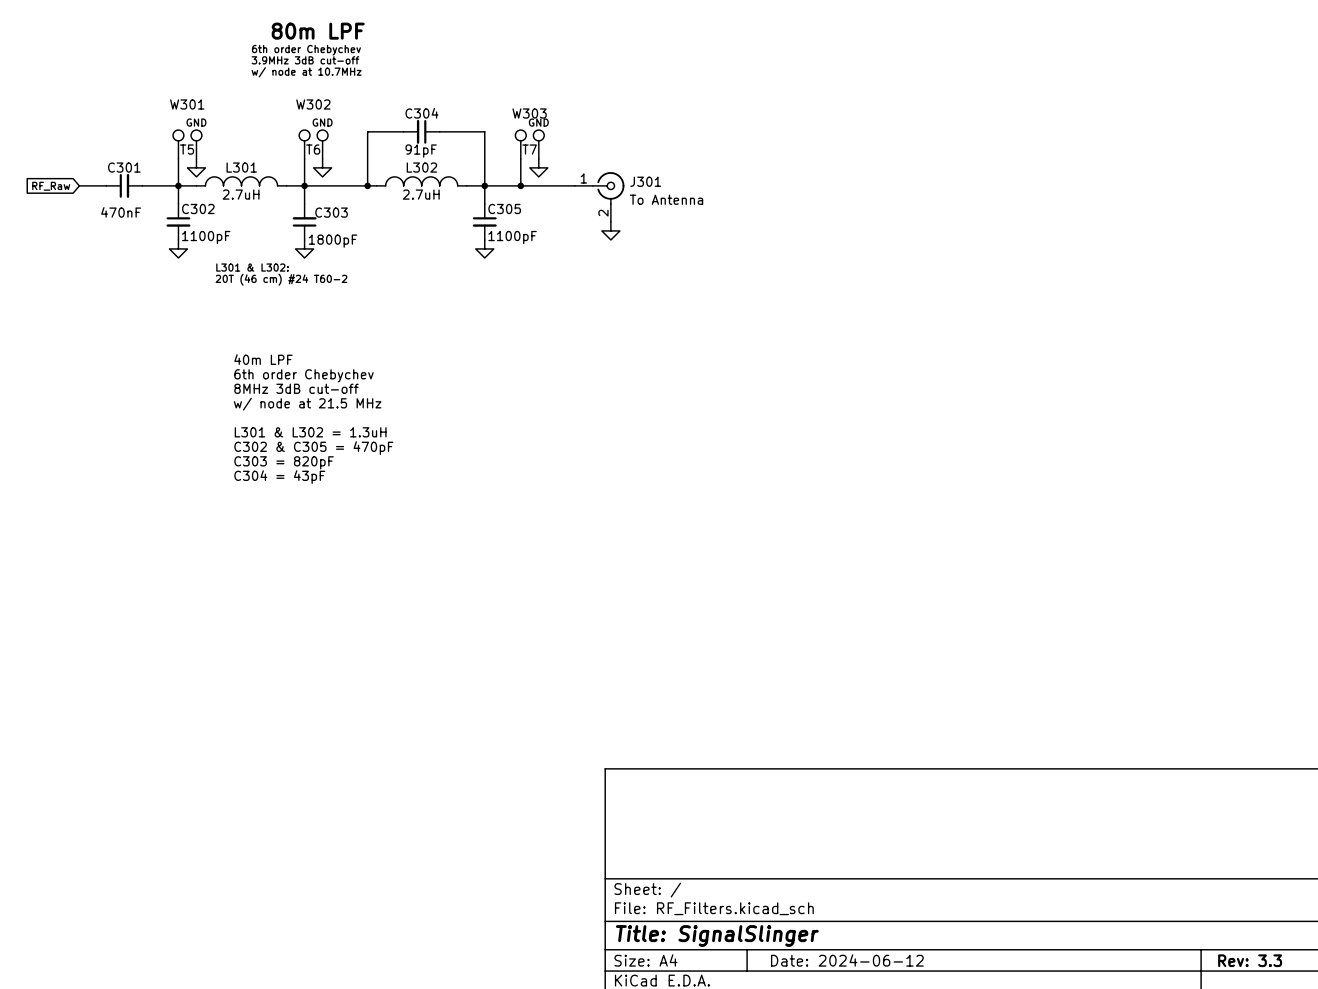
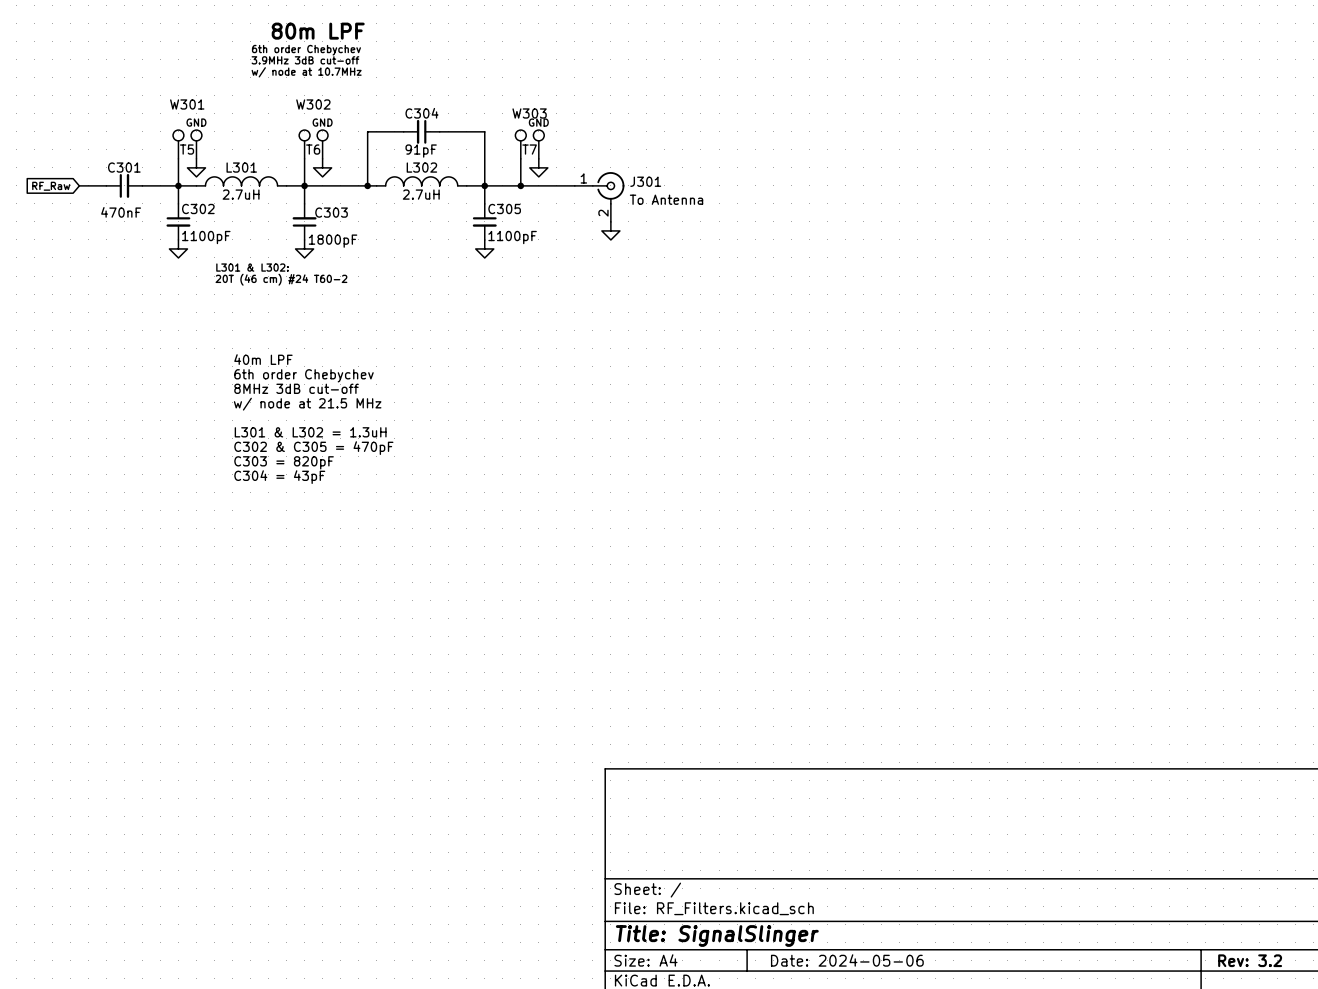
title block: Date: 2024-06-12 (847, 960) -> Date: 2024-05-06 (847, 960)
title block: Rev: 3.3 (1250, 960) -> Rev: 3.2 (1250, 960)

